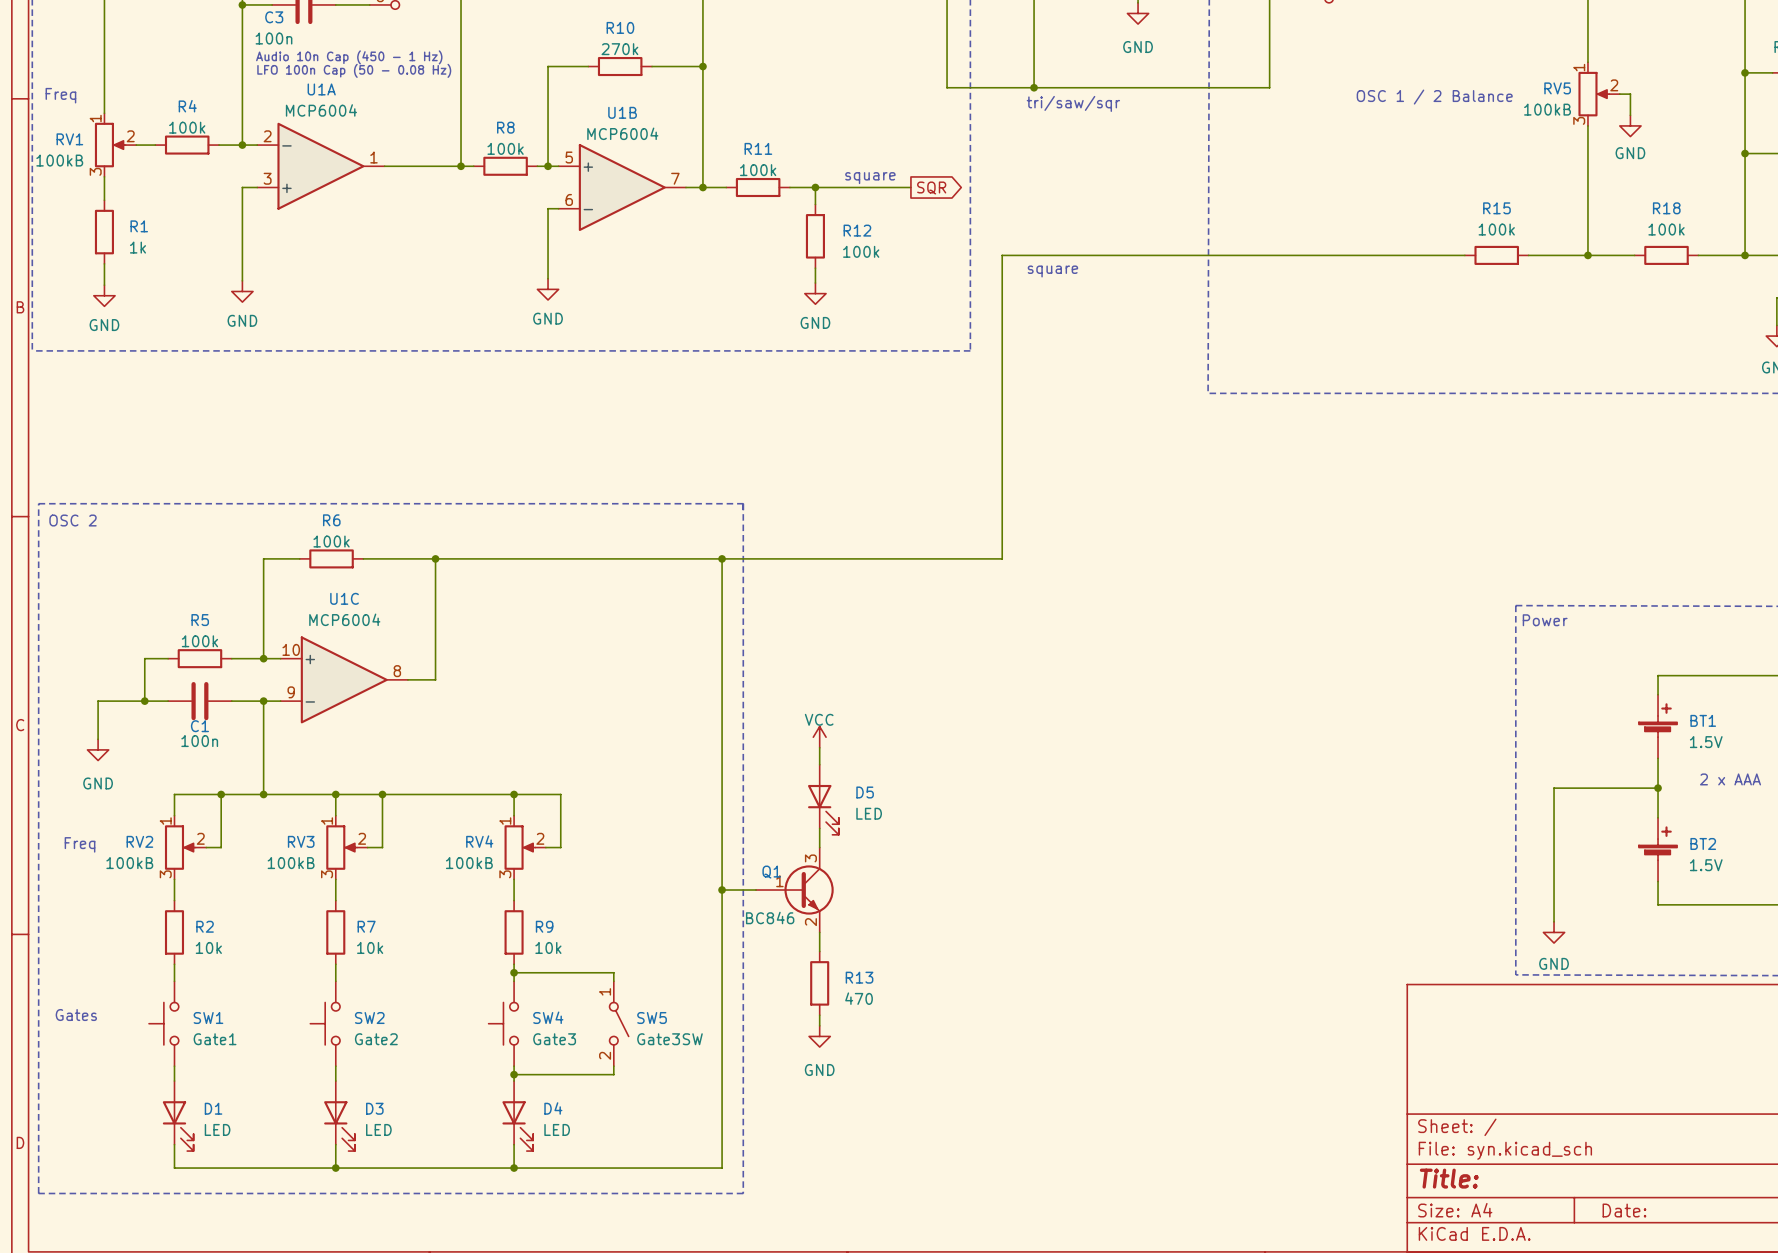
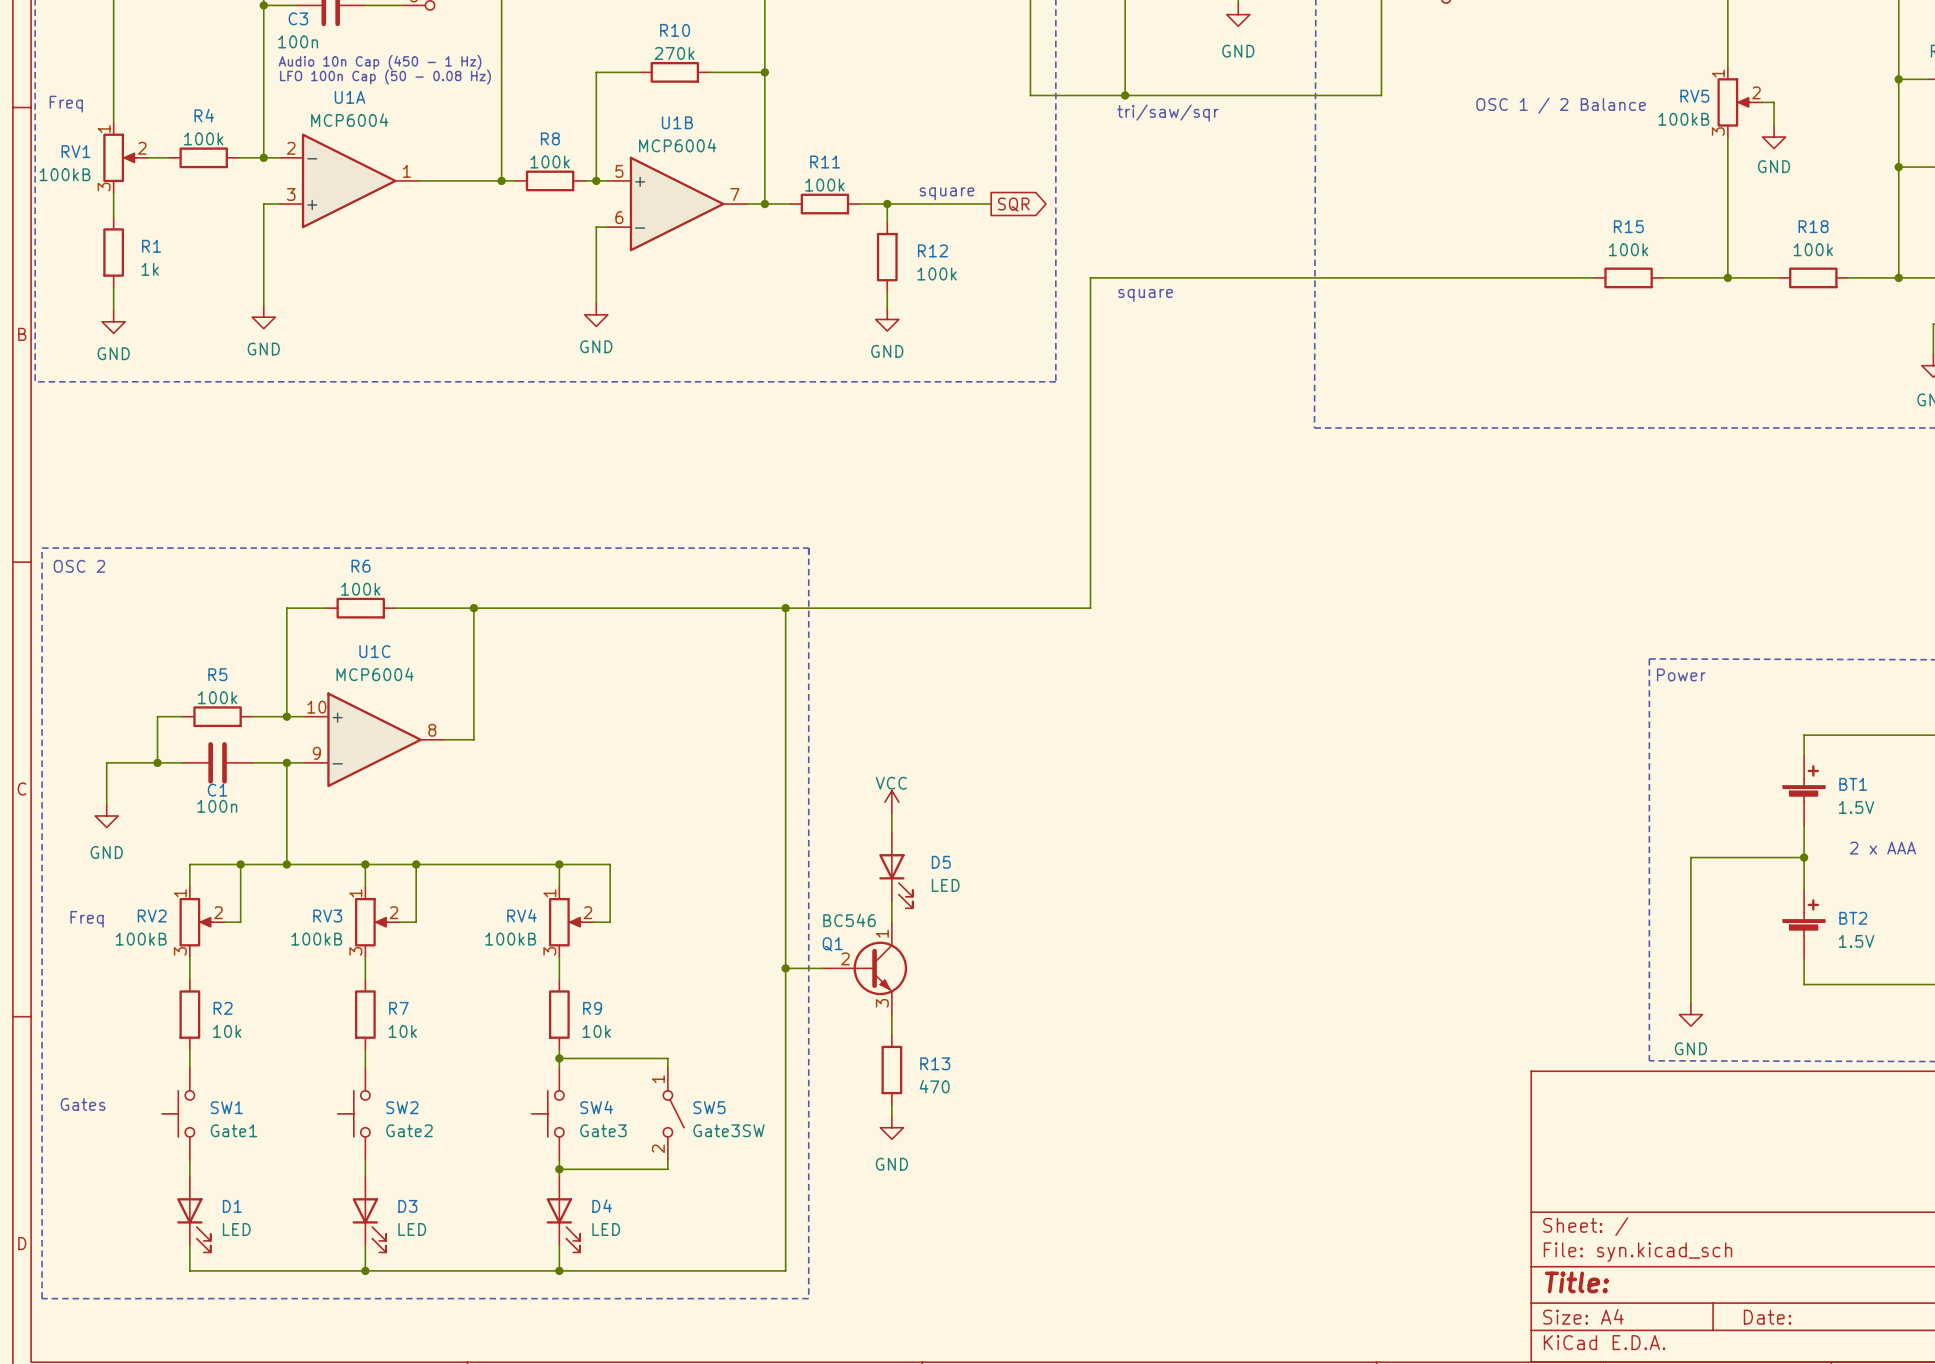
Q1 symbol: [756, 847, 834, 933] -> [822, 922, 908, 1015]
Q1 value: BC846 (770, 918) -> BC546 (849, 920)

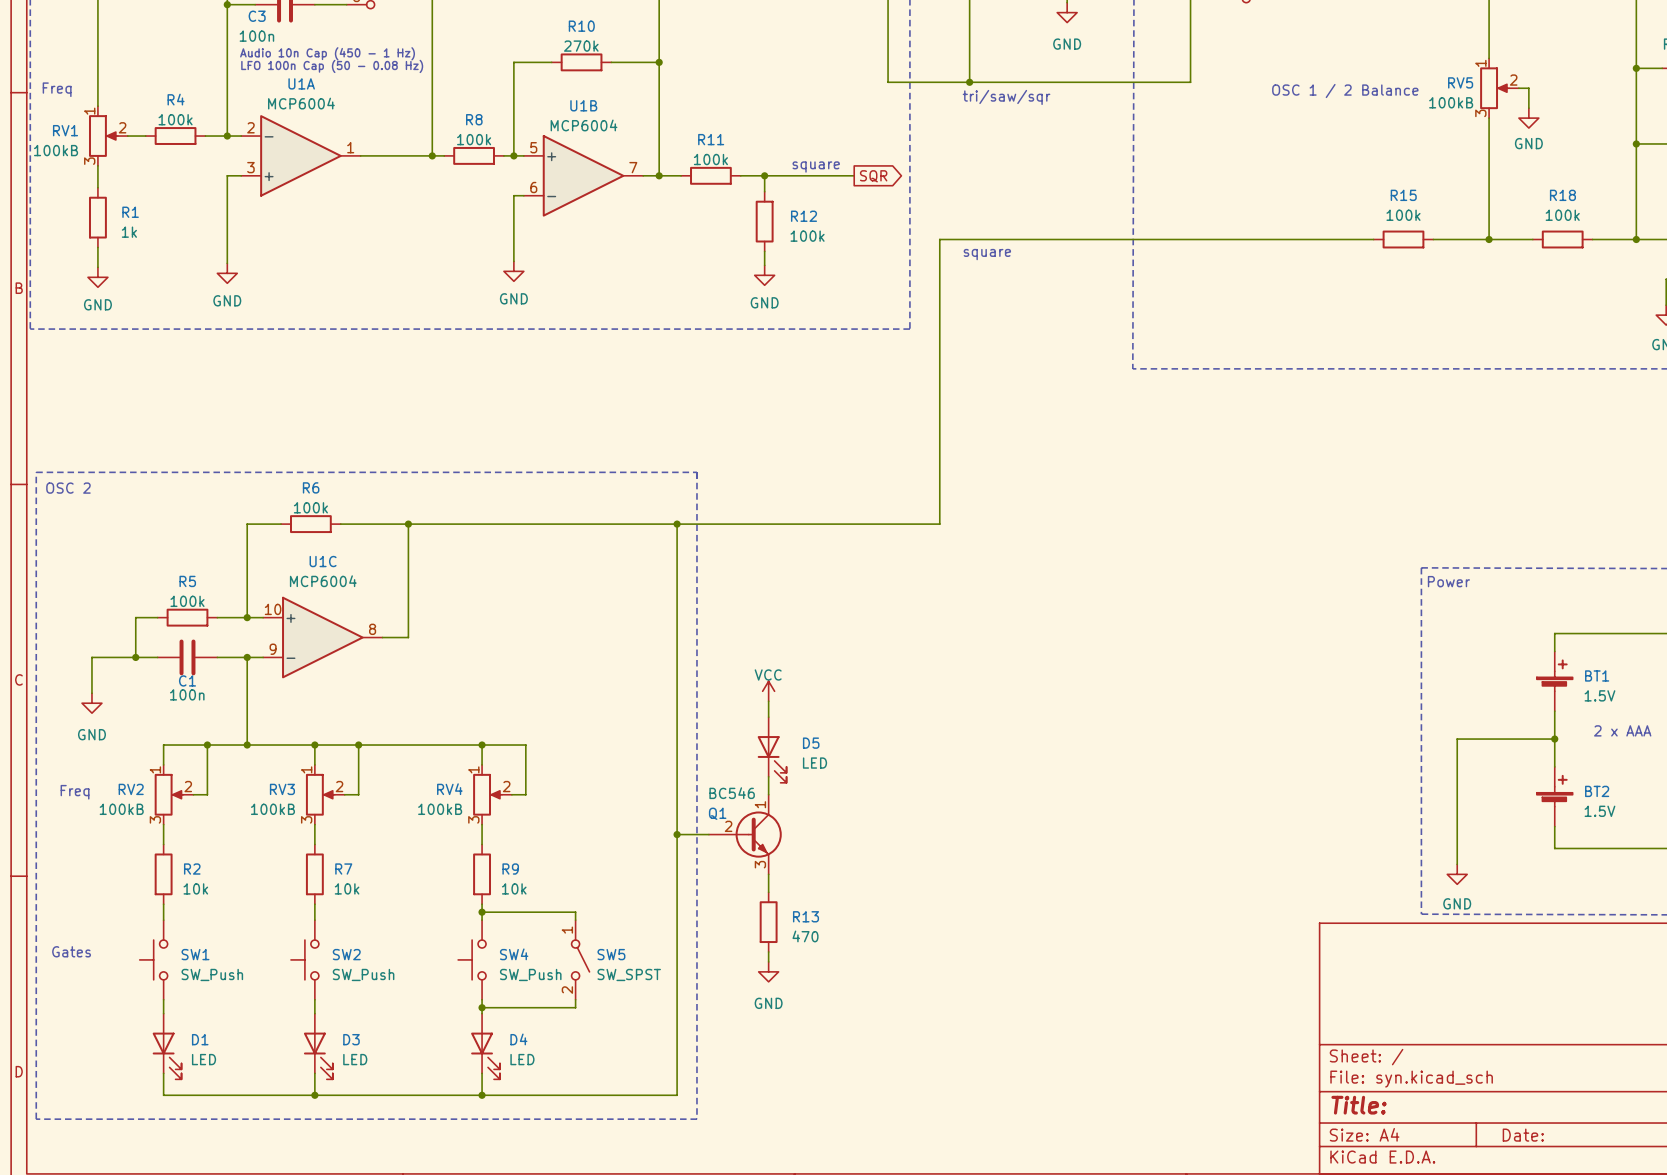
SW1 value: Gate1 (233, 1130) -> SW_Push (212, 974)
SW2 value: Gate2 (409, 1130) -> SW_Push (363, 974)
SW4 value: Gate3 (603, 1130) -> SW_Push (530, 974)
SW5 value: Gate3SW (729, 1130) -> SW_SPST (629, 974)

